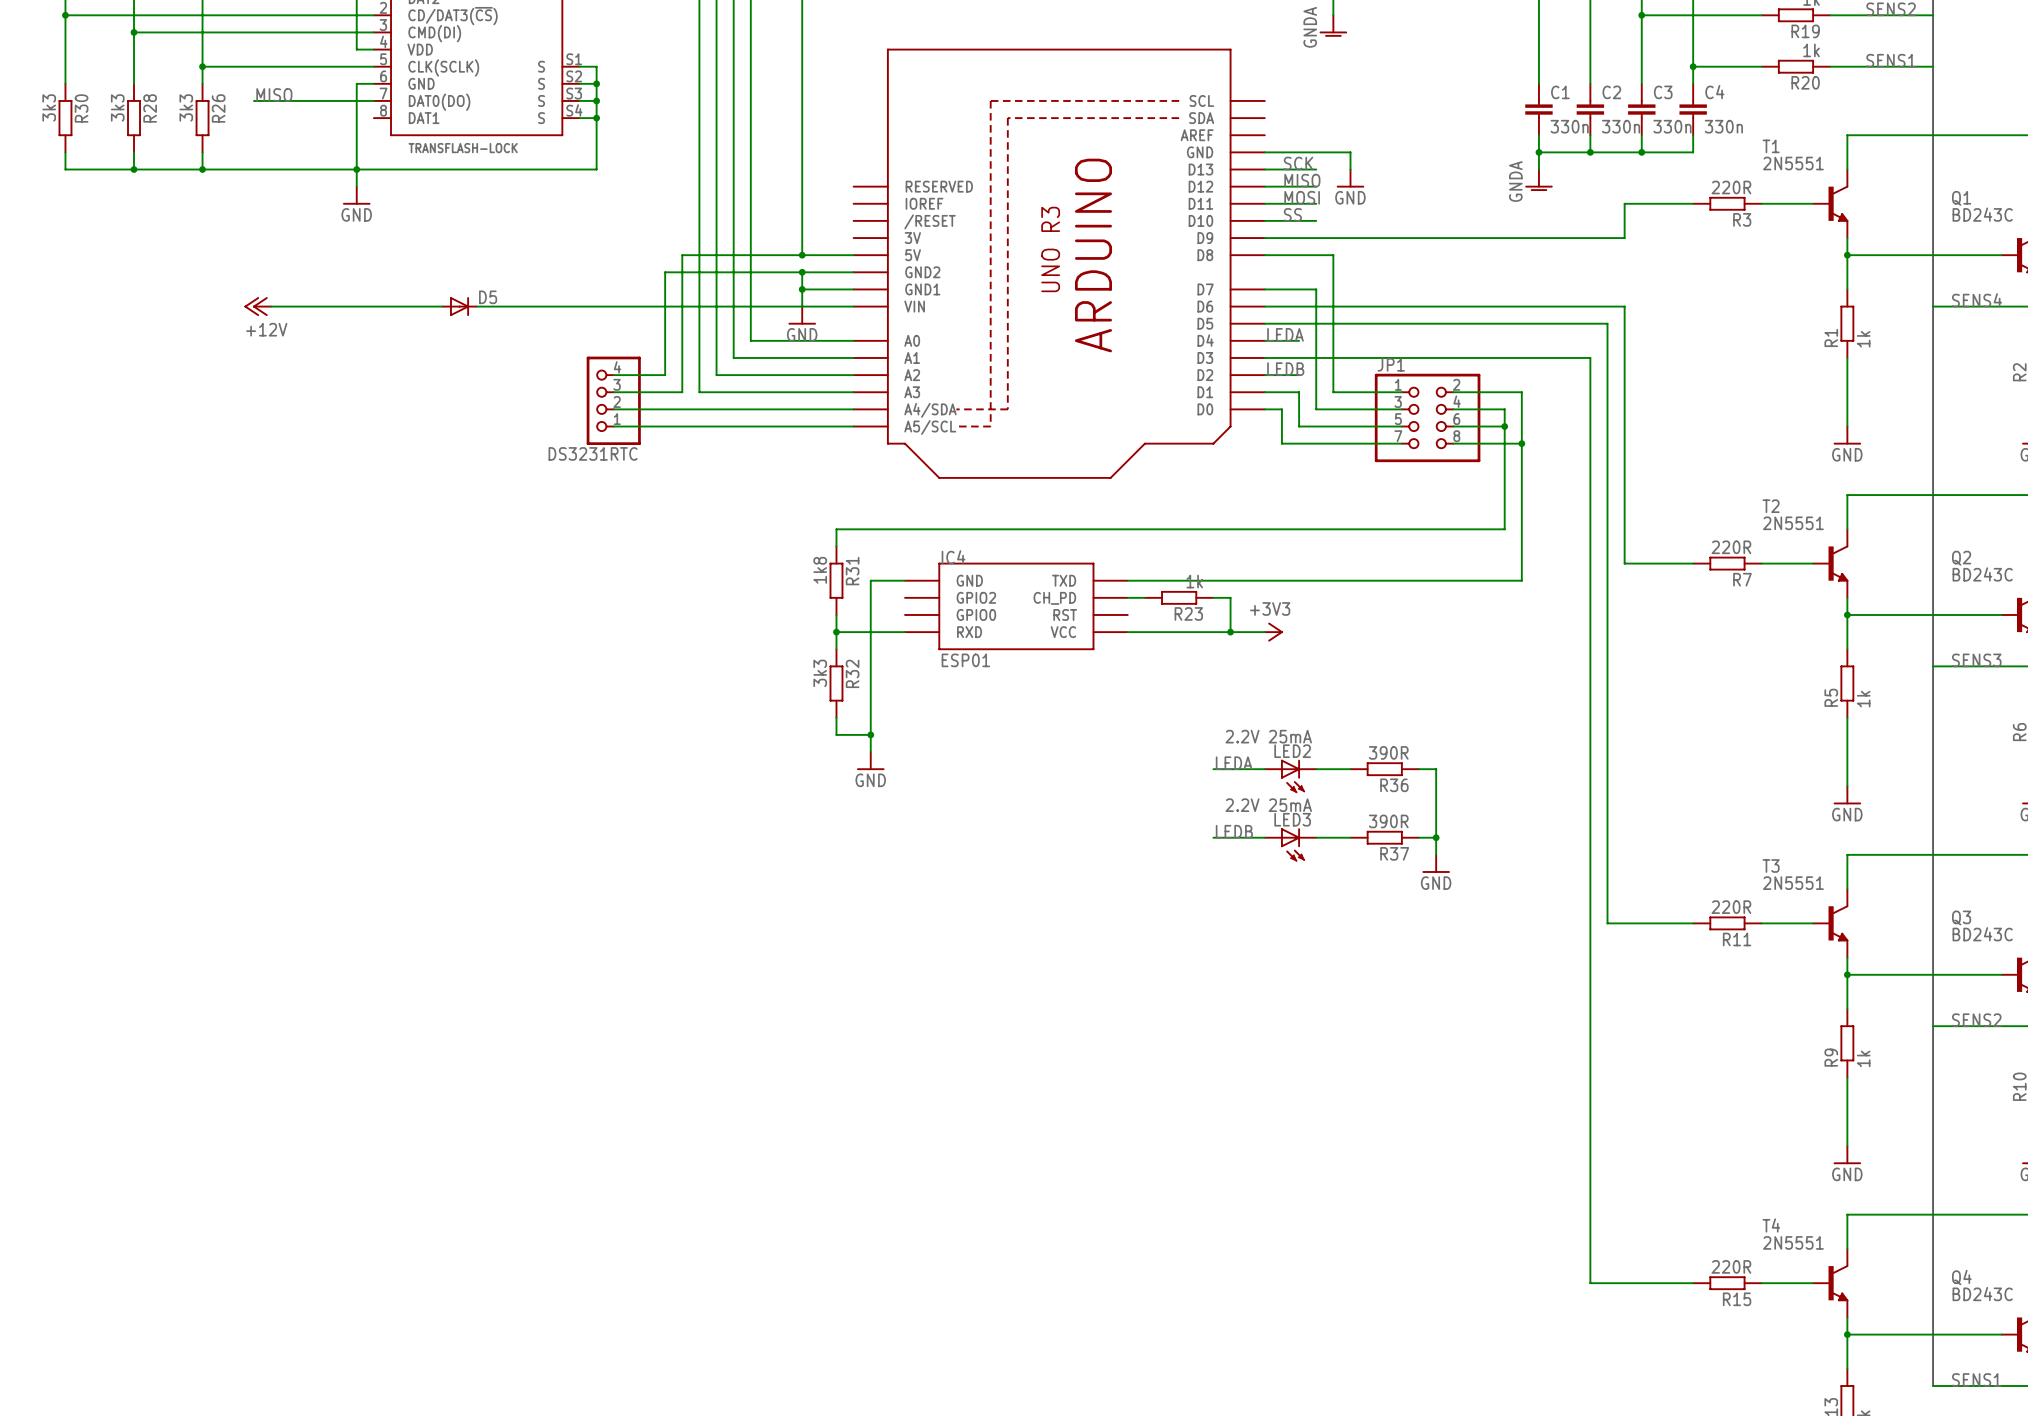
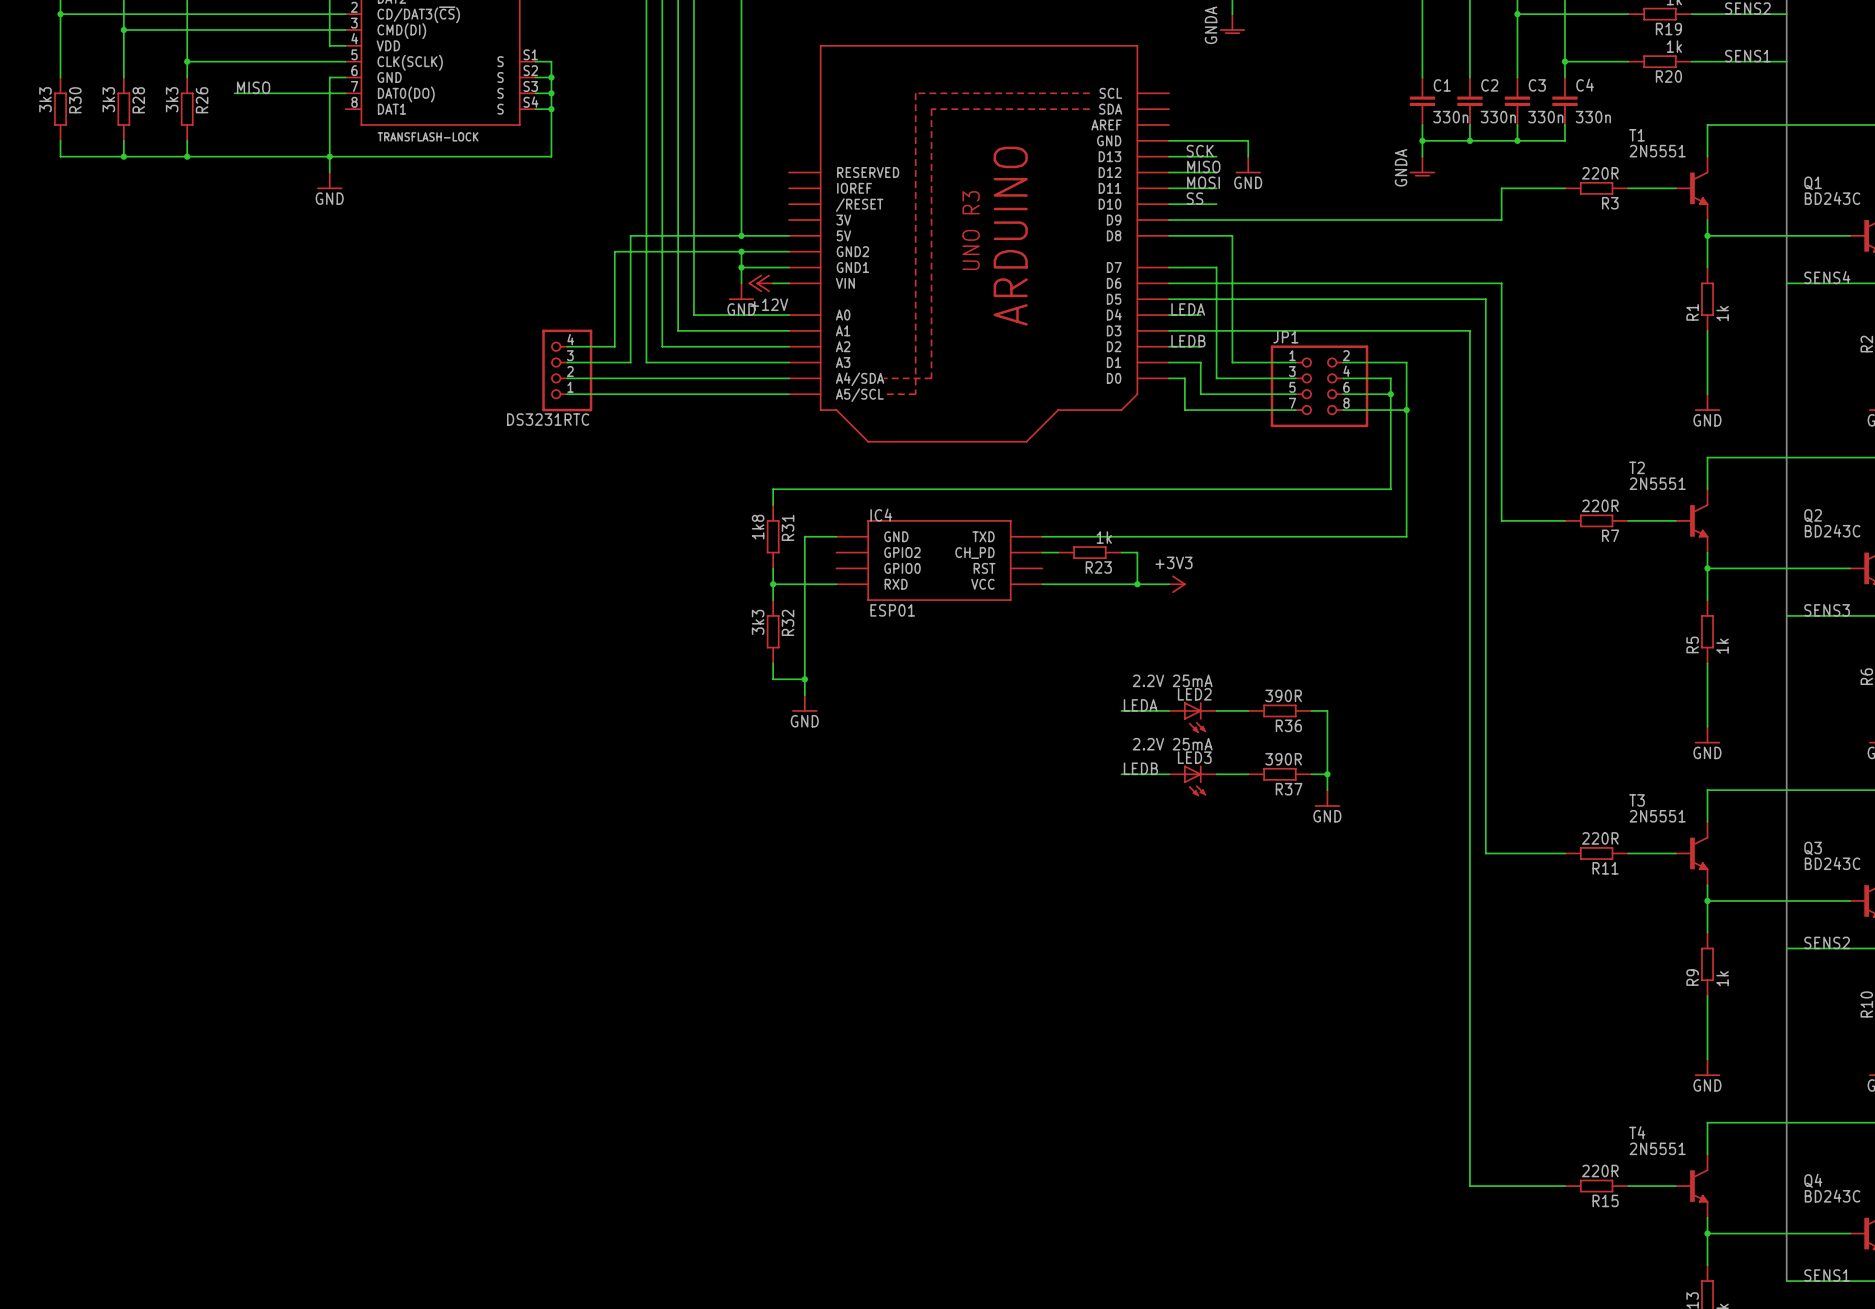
power symbol: +12V (257, 306) -> none
wire: (271, 306) (442, 306) -> none
D5: (459, 306) -> none
wire: (476, 306) (836, 306) -> none
power symbol: none -> +12V (760, 283)

